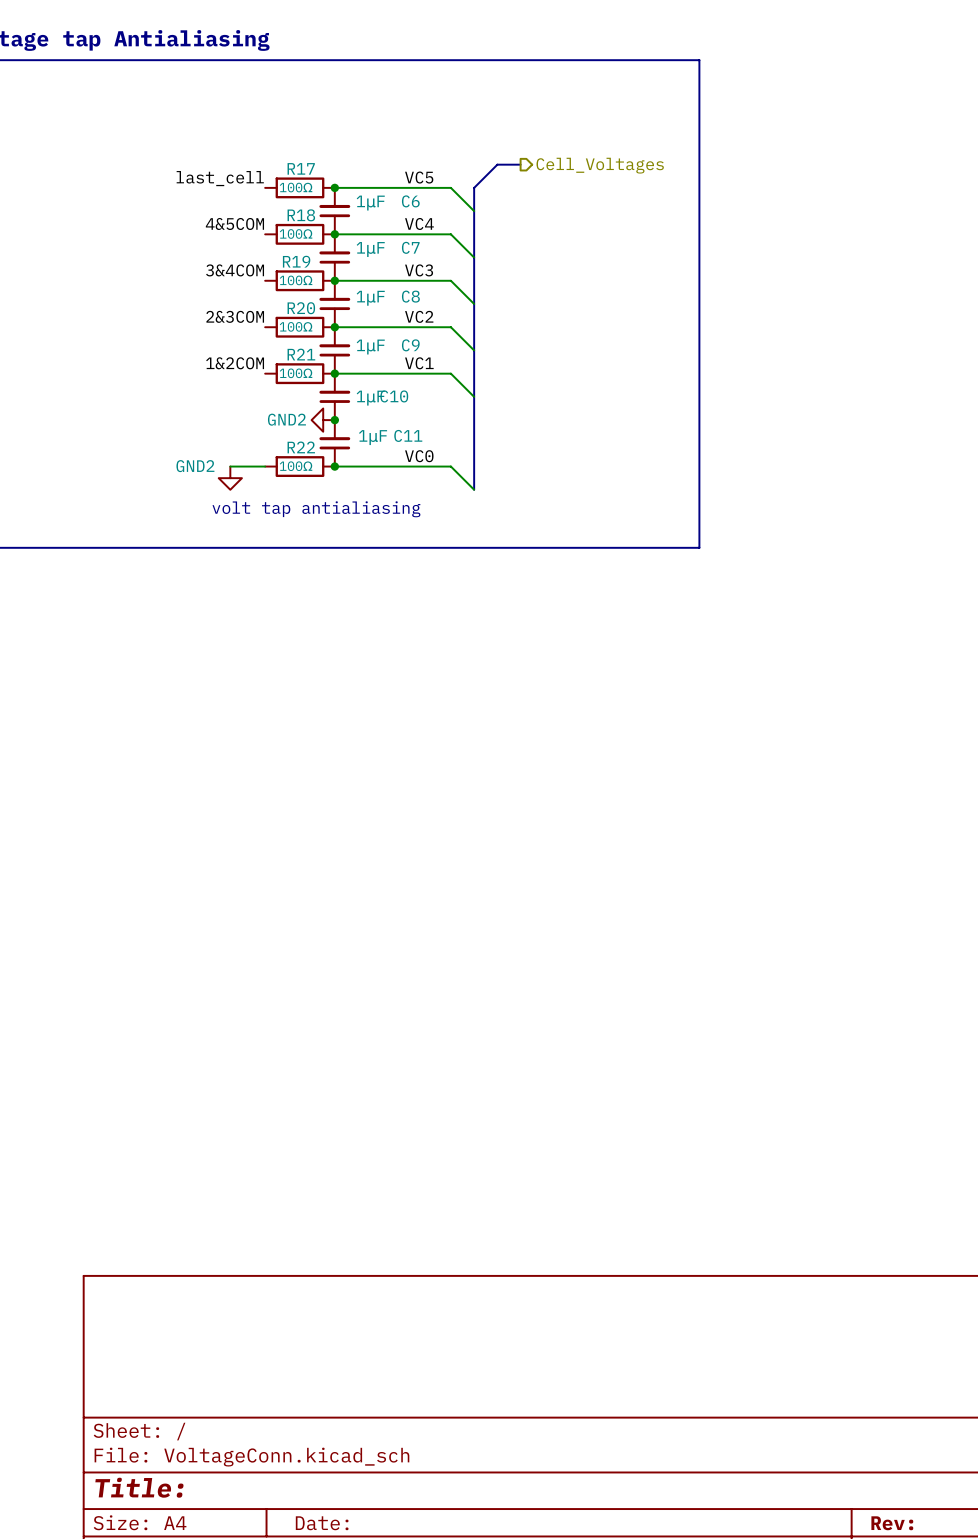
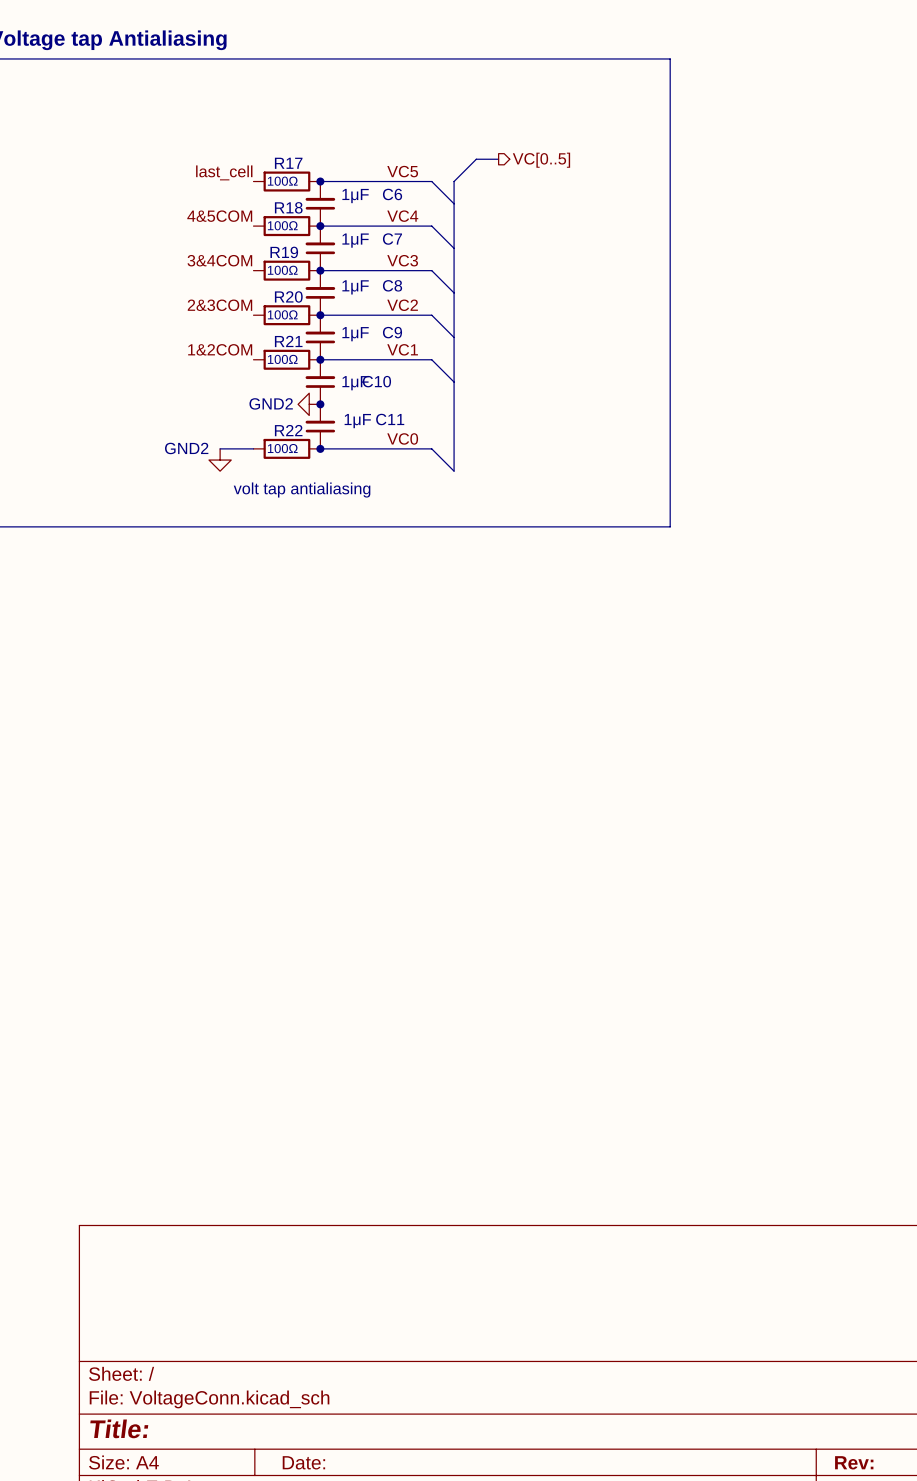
hierarchical label: Cell_Voltages (600, 165) -> VC[0..5] (541, 160)

